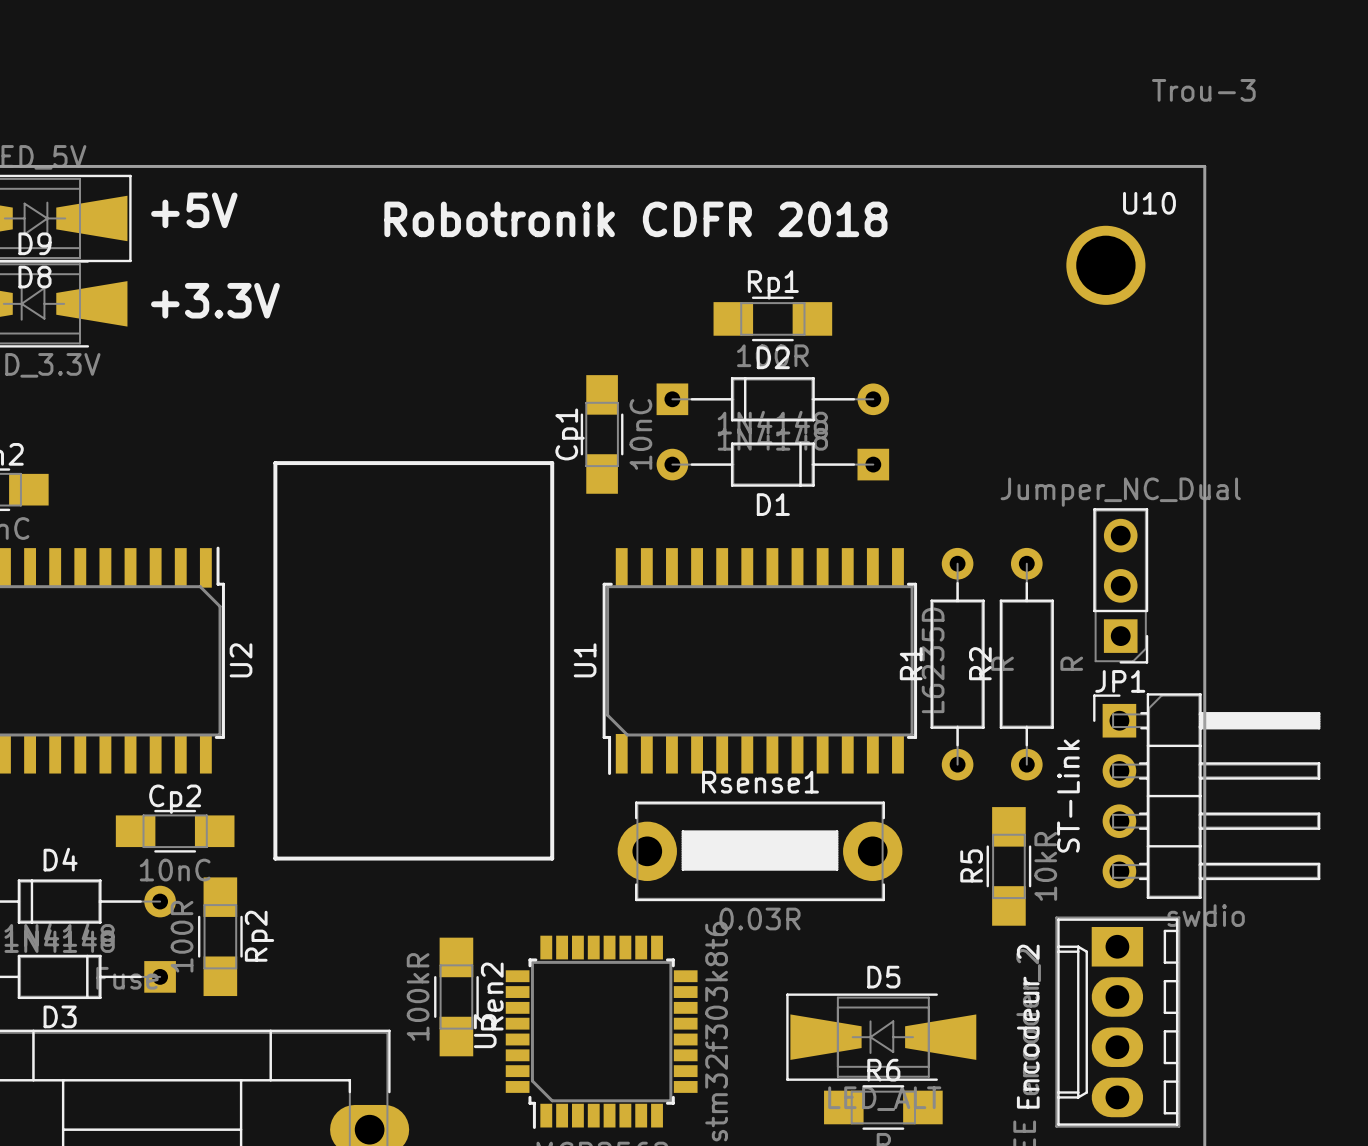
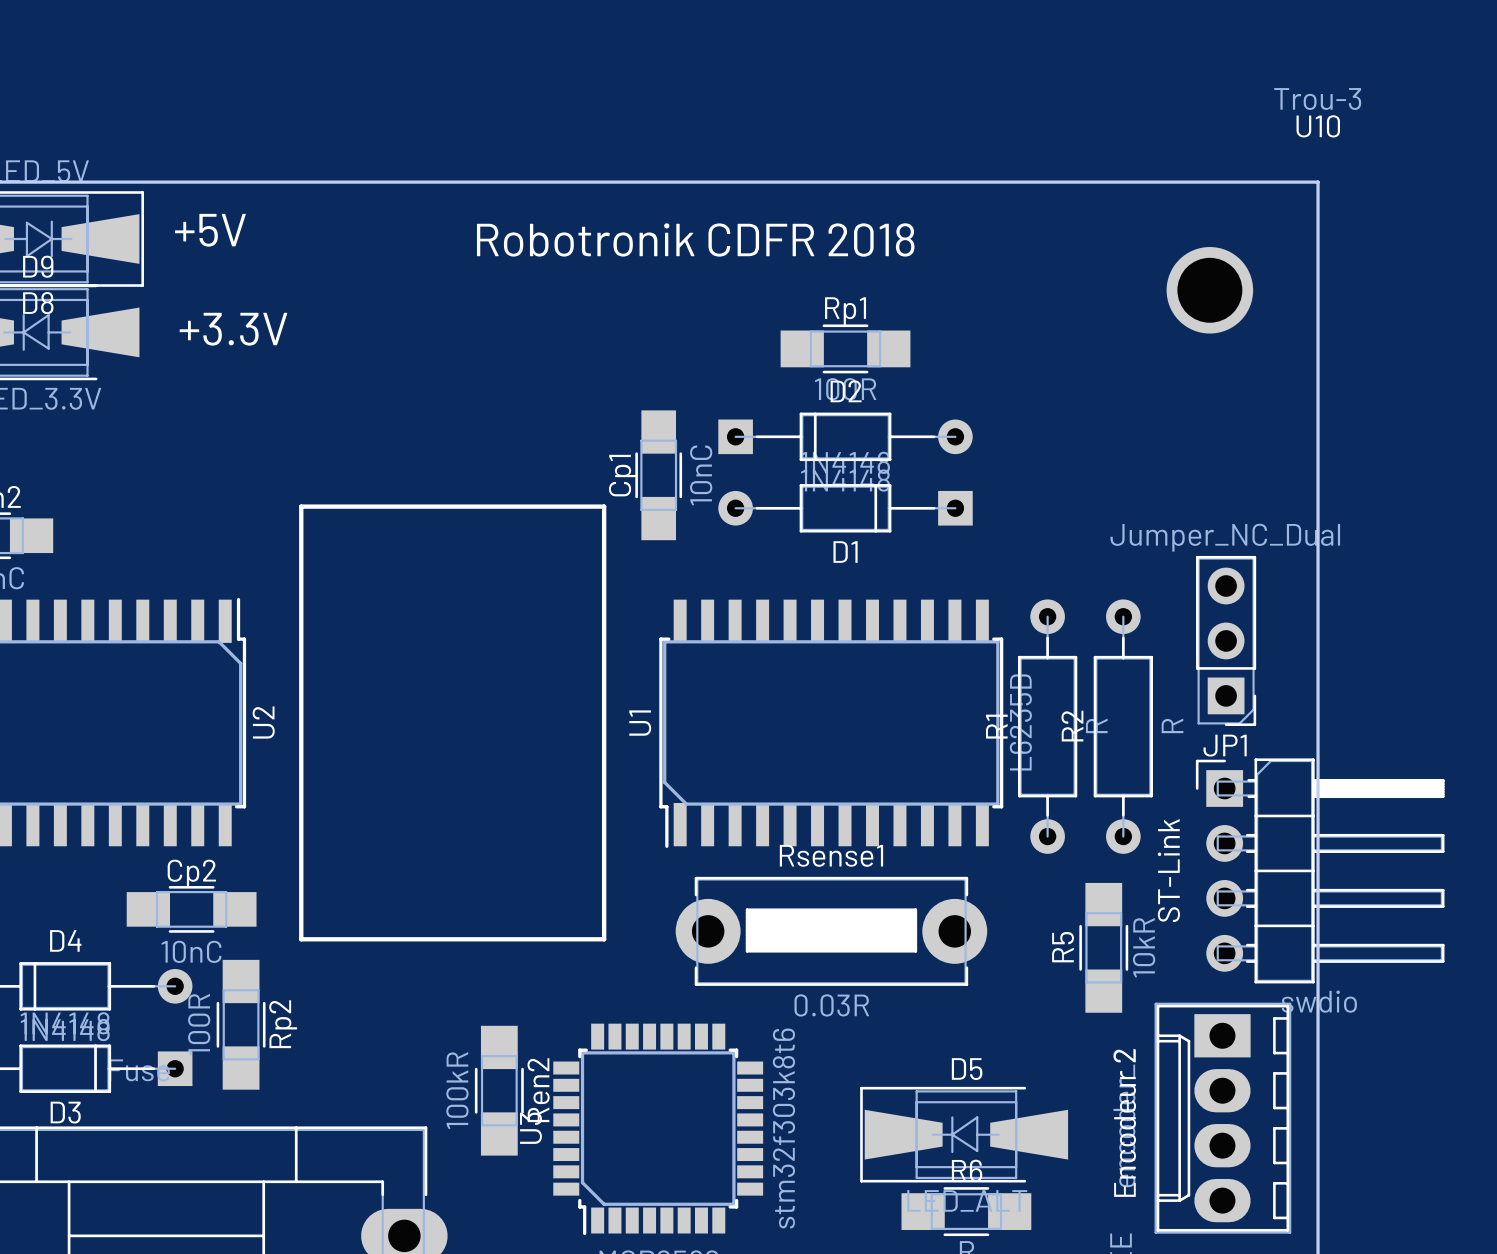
U10 name position: U10 (1149, 203) -> U10 (1318, 126)

